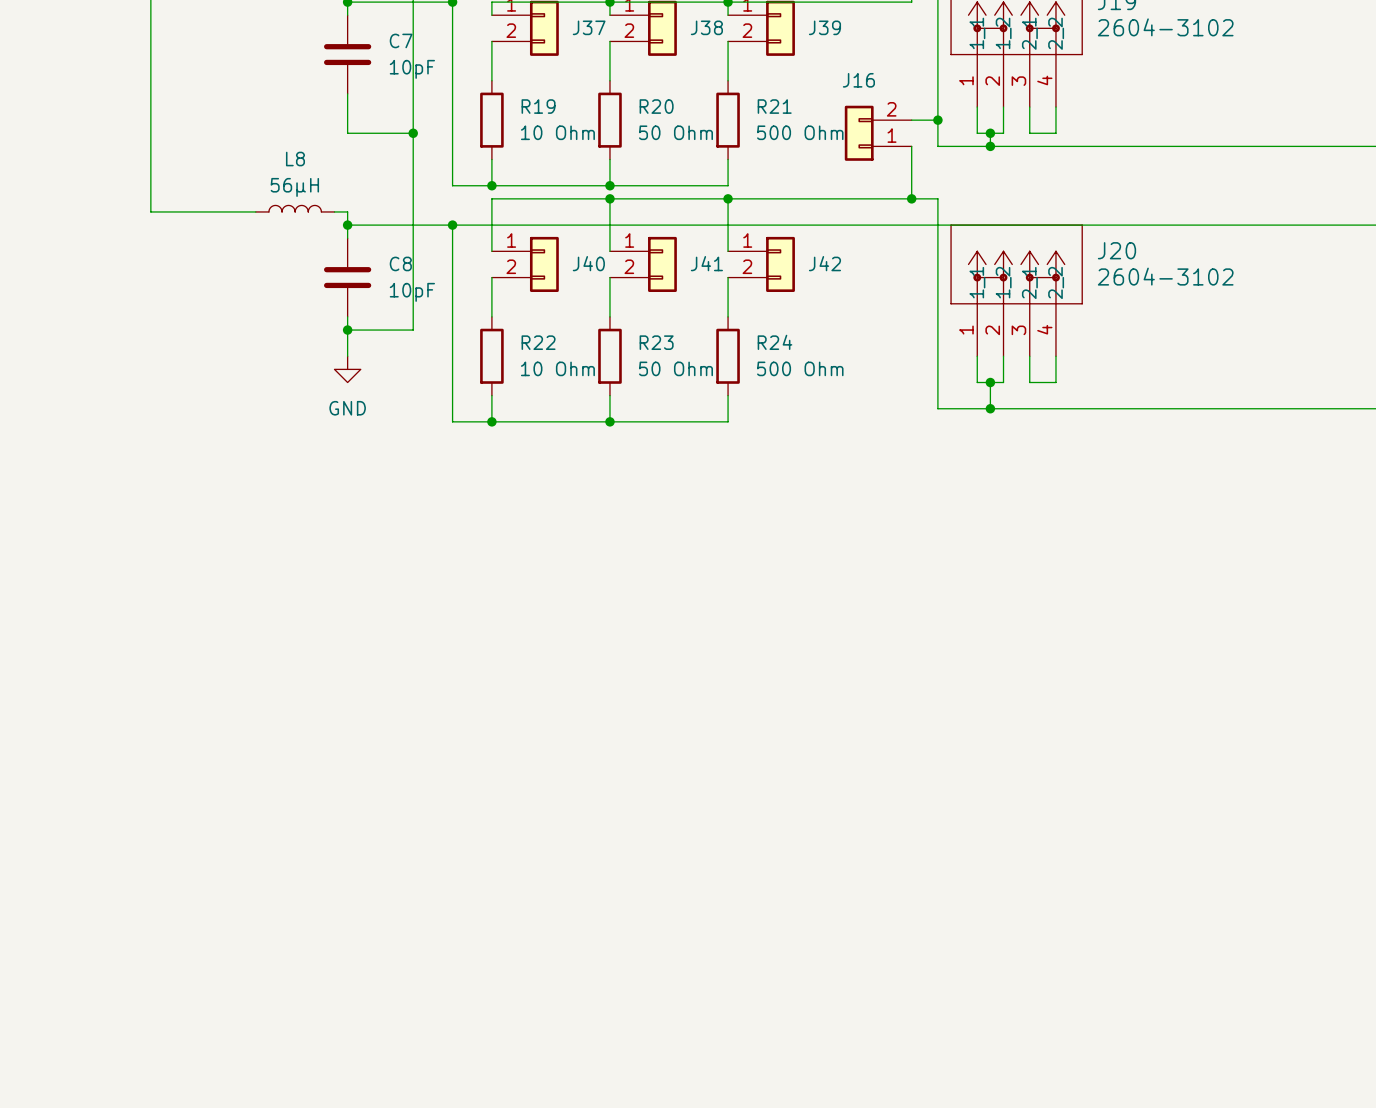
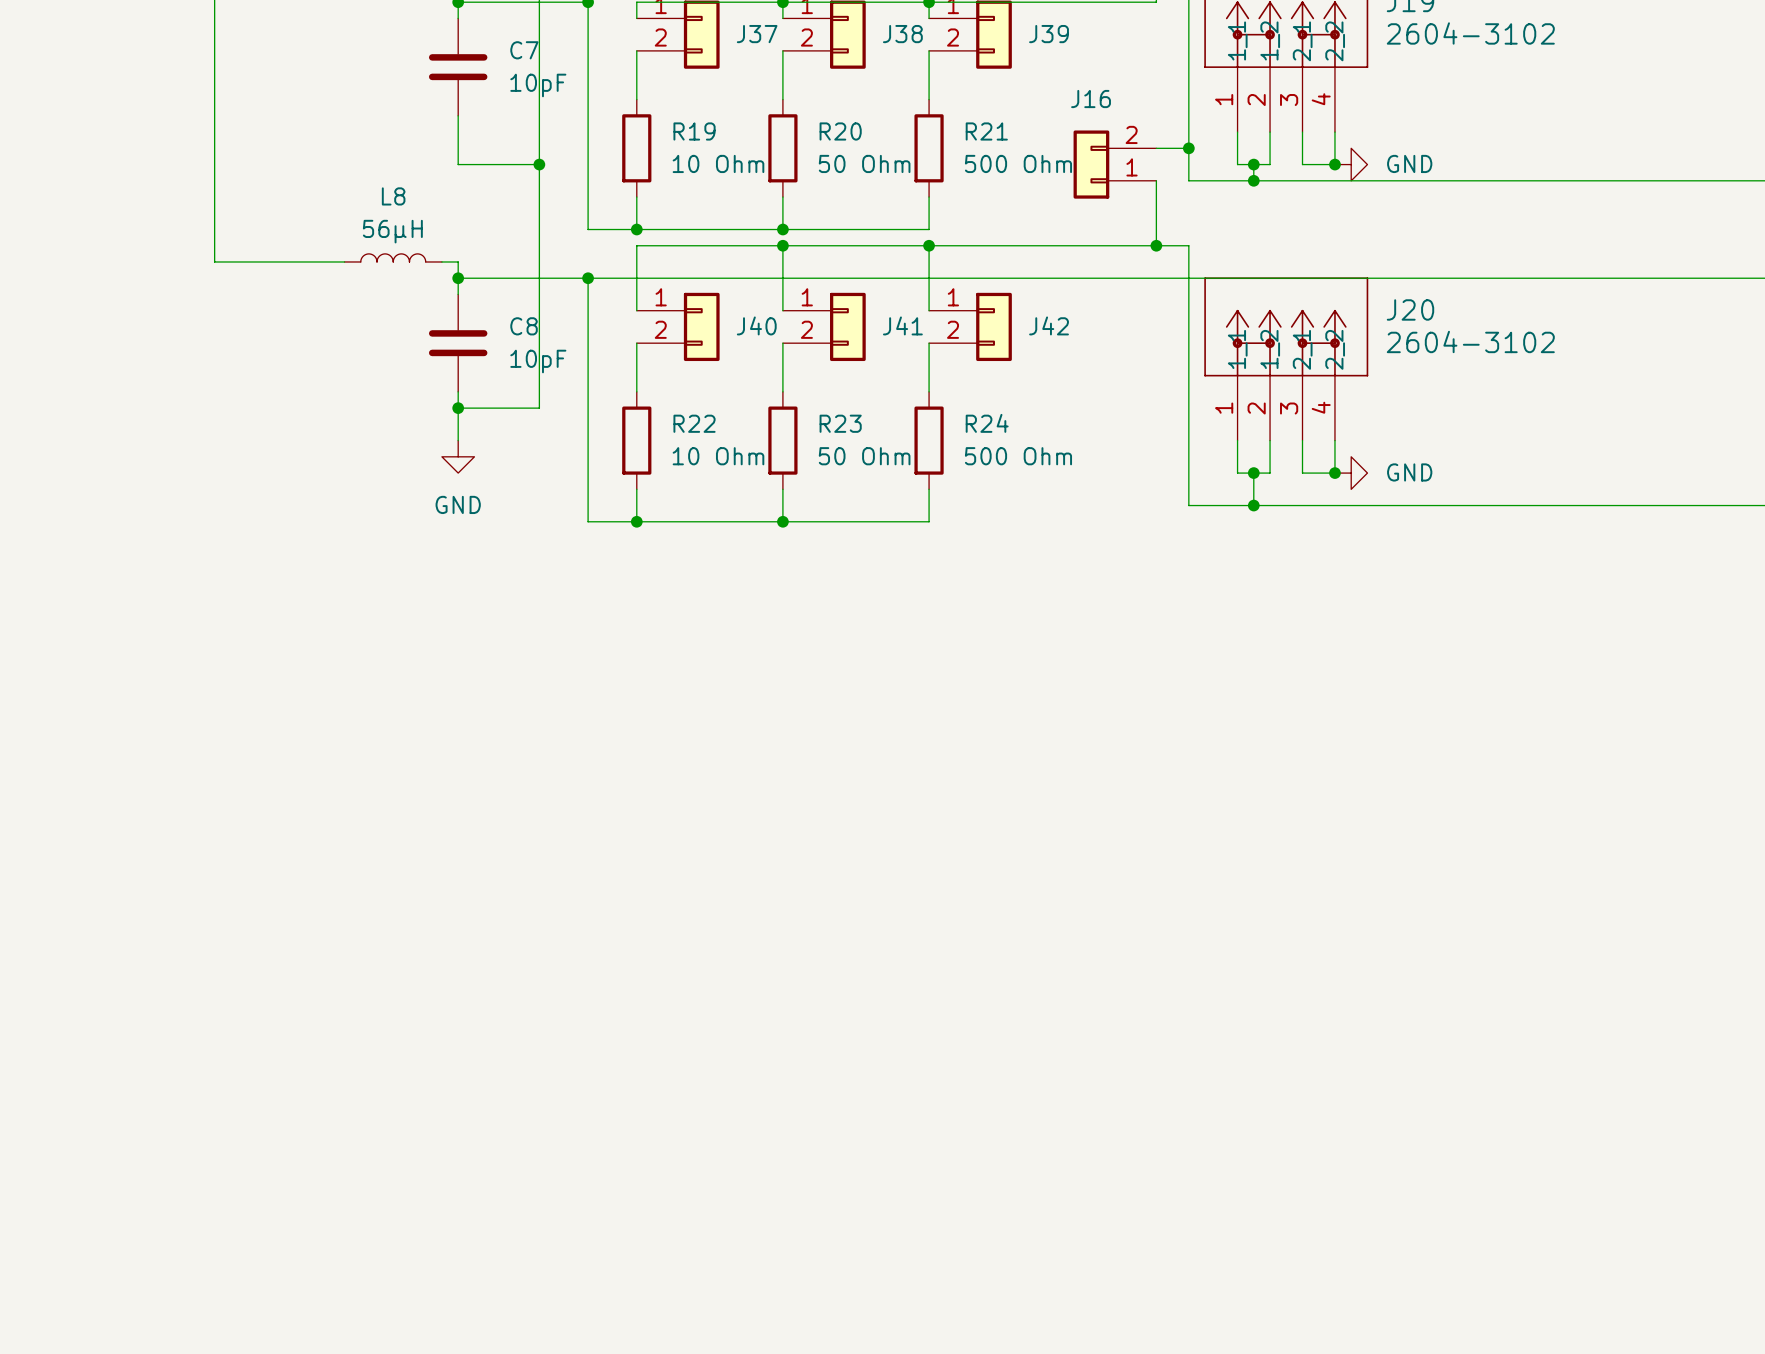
junction: none -> (1334, 164)
power symbol: none -> GND (1351, 164)
junction: none -> (1334, 473)
power symbol: none -> GND (1351, 473)

